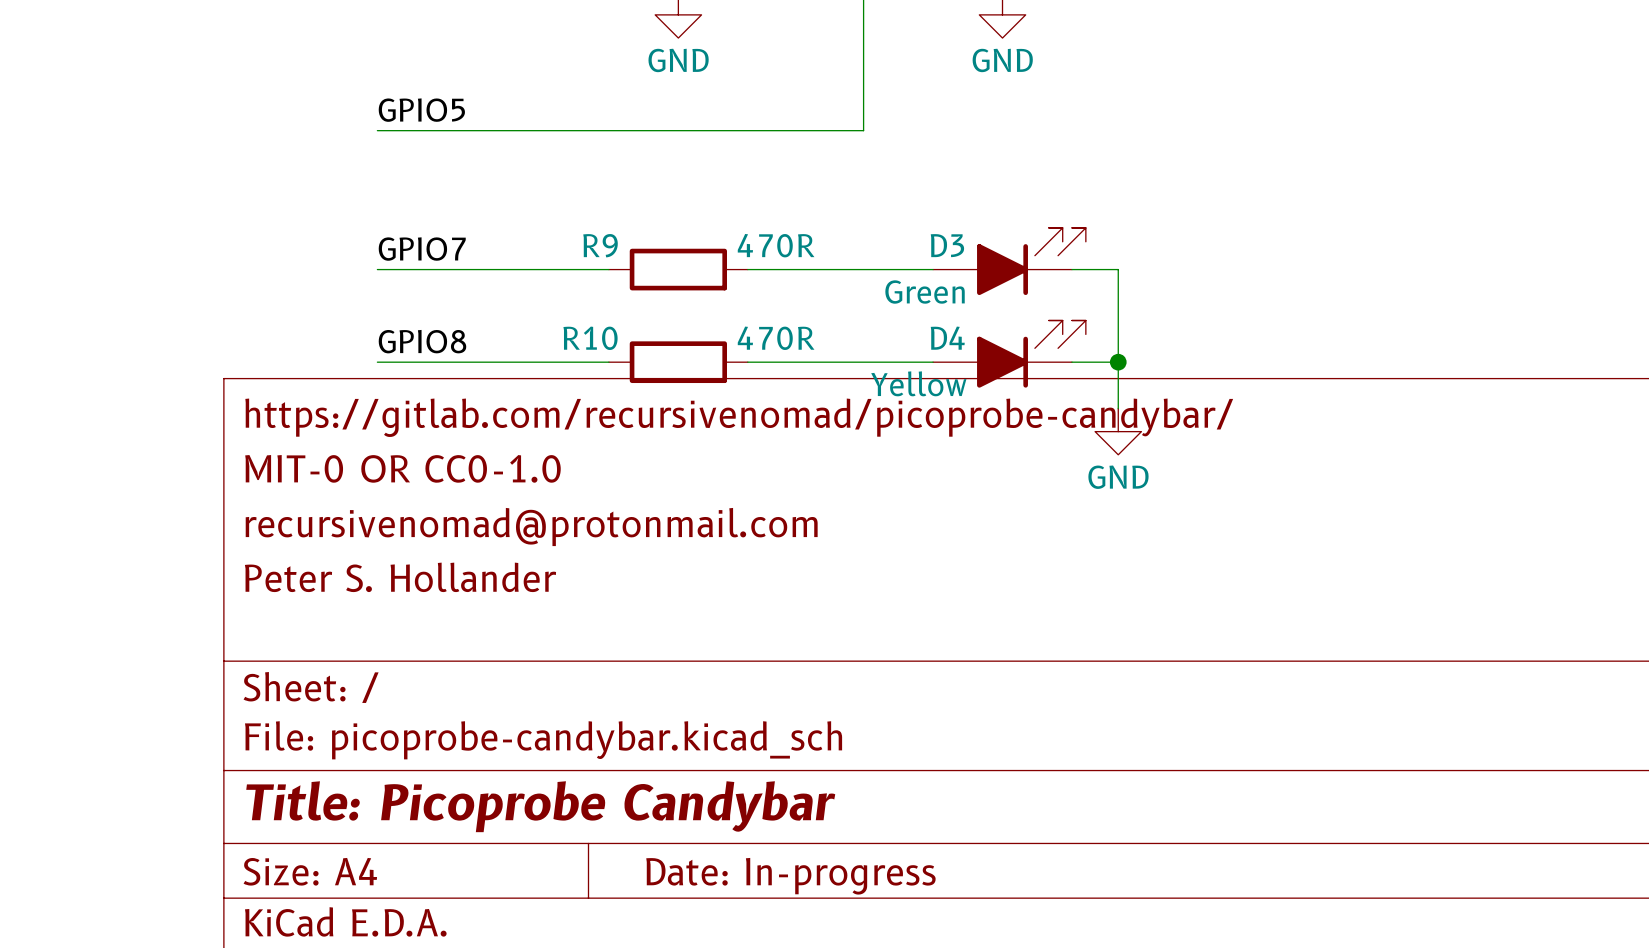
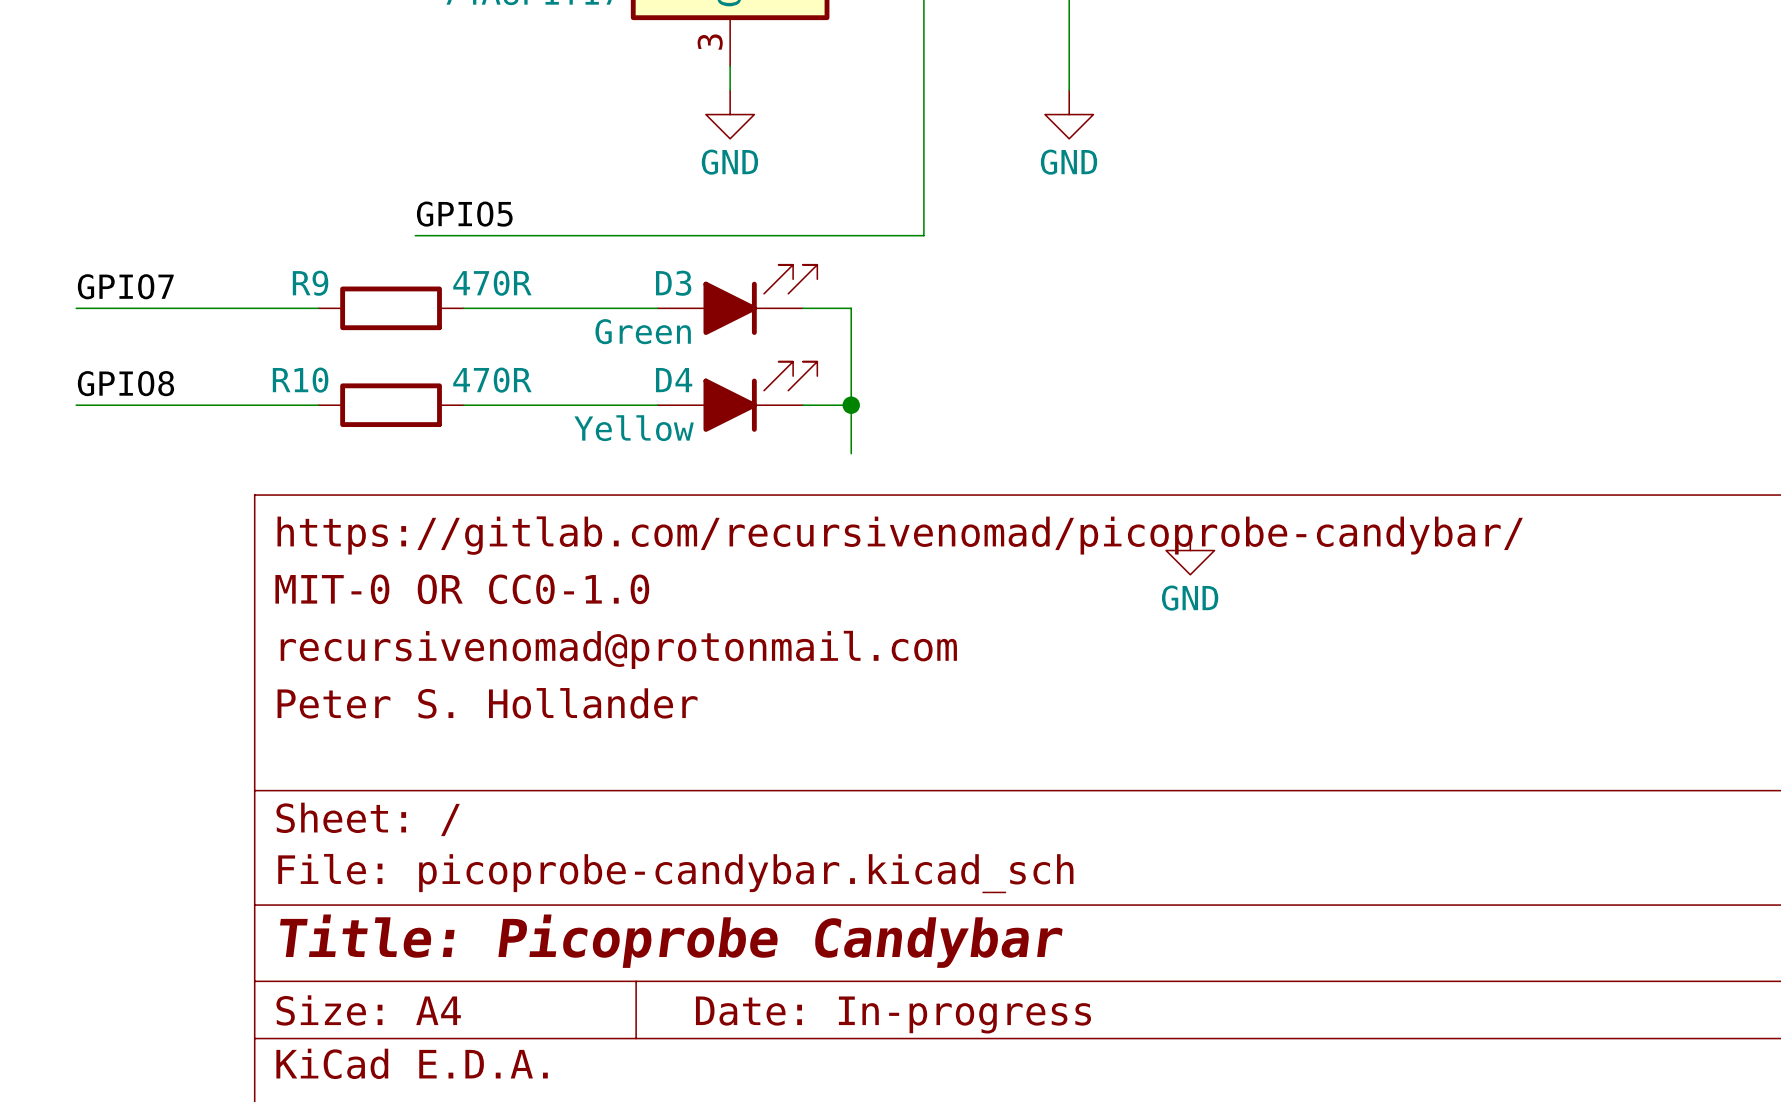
label position: GPIO7 (422, 249) -> GPIO7 (125, 286)
D3 position: (1009, 261) -> (737, 299)
wire: (377, 269) (608, 269) -> (76, 308) (318, 308)
R9 position: (678, 269) -> (391, 308)
wire: (747, 269) (933, 269) -> (463, 308) (657, 308)
wire: (1071, 269) (1118, 269) (1118, 408) -> (802, 308) (851, 308) (851, 453)
junction: none -> (851, 405)
label position: GPIO8 (422, 341) -> GPIO8 (125, 383)
D4 position: (1009, 354) -> (737, 396)
wire: (377, 362) (608, 362) -> (76, 405) (318, 405)
R10 position: (678, 362) -> (391, 405)
wire: (747, 362) (933, 362) -> (463, 405) (657, 405)
wire: (1071, 362) (1118, 362) -> (802, 405) (851, 405)
junction: (1118, 362) -> none

